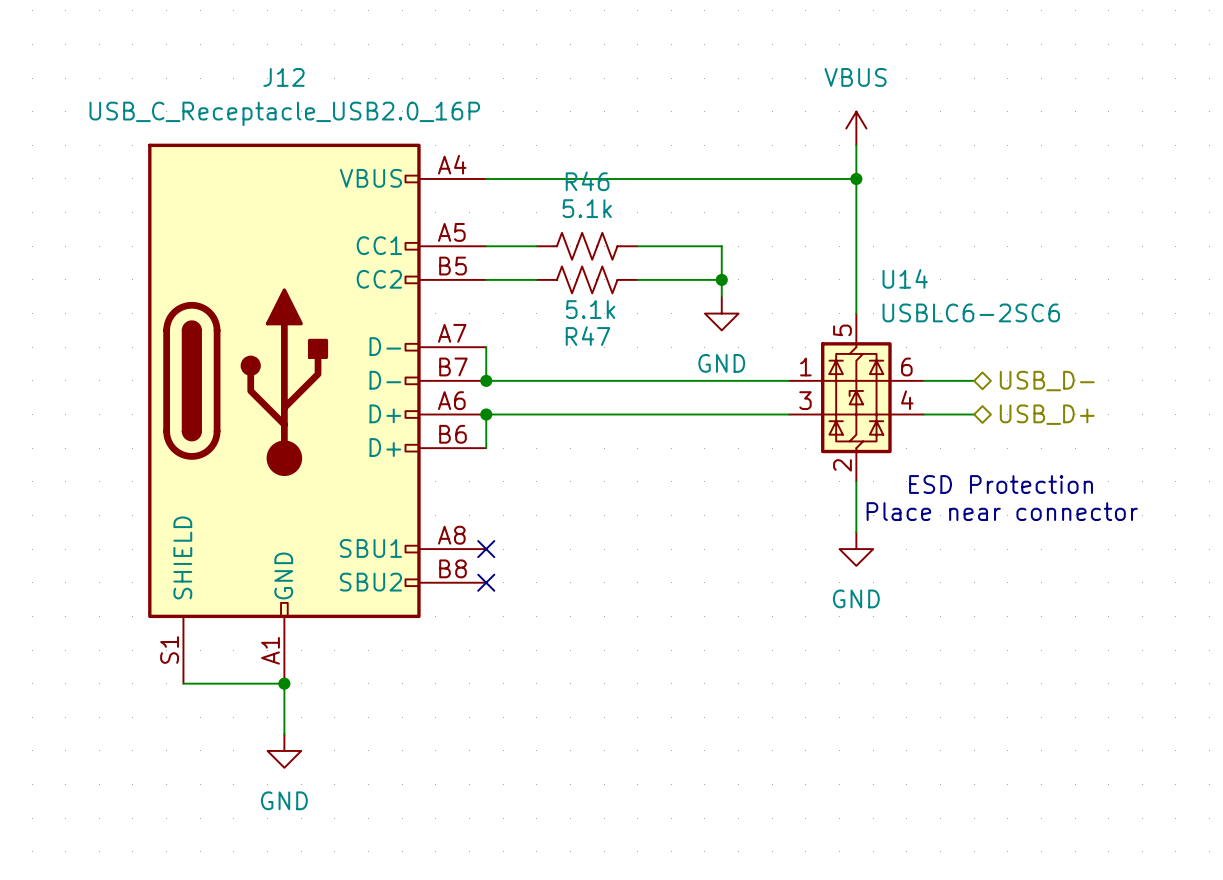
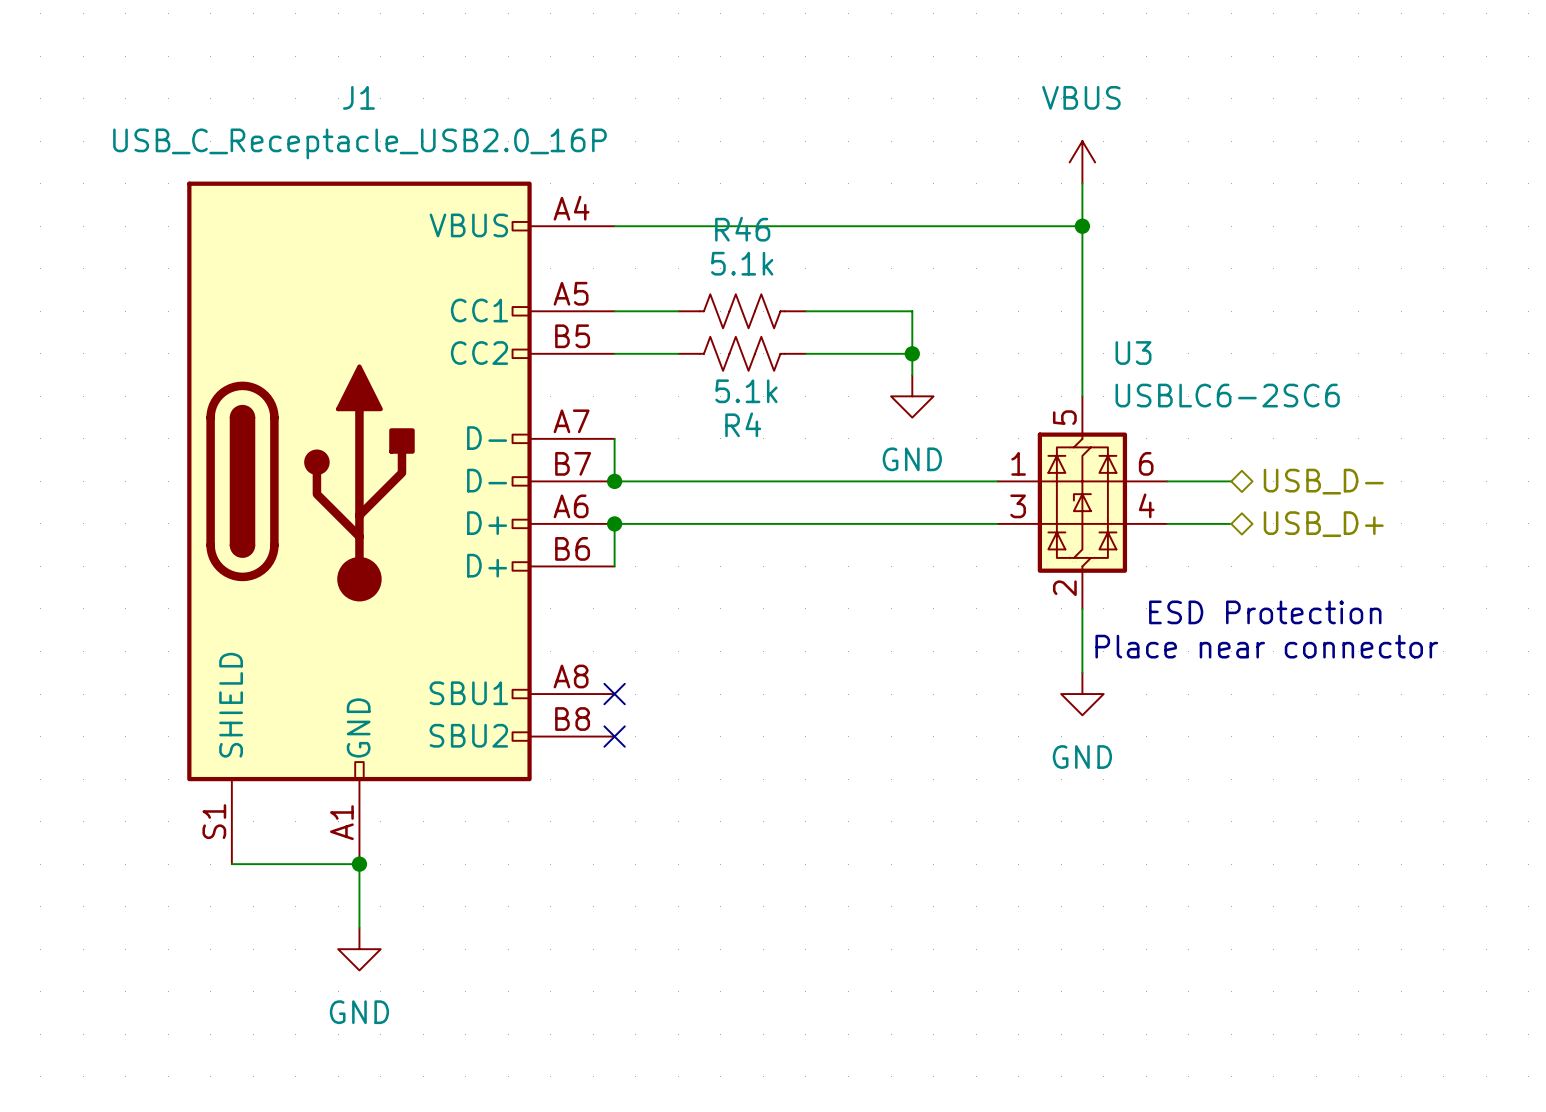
J12 name: J12 (283, 77) -> J1 (358, 97)
U14 name: U14 (905, 278) -> U3 (1133, 353)
R47 name: R47 (587, 336) -> R4 (743, 424)

